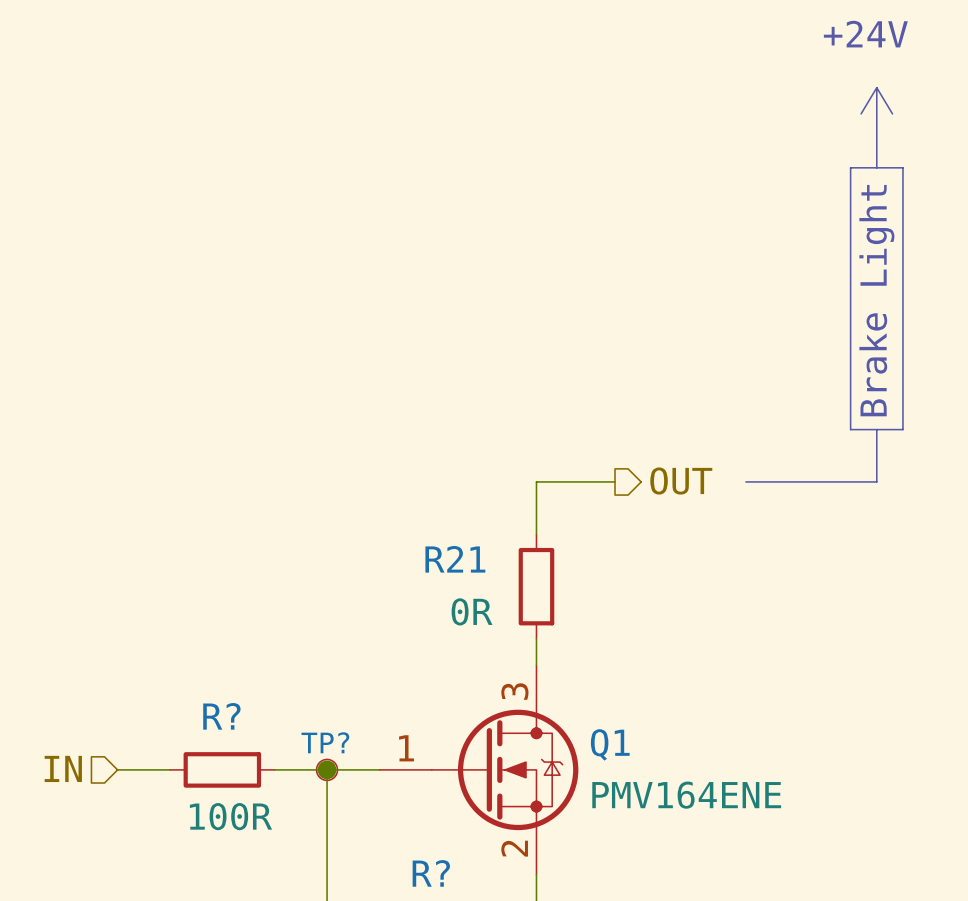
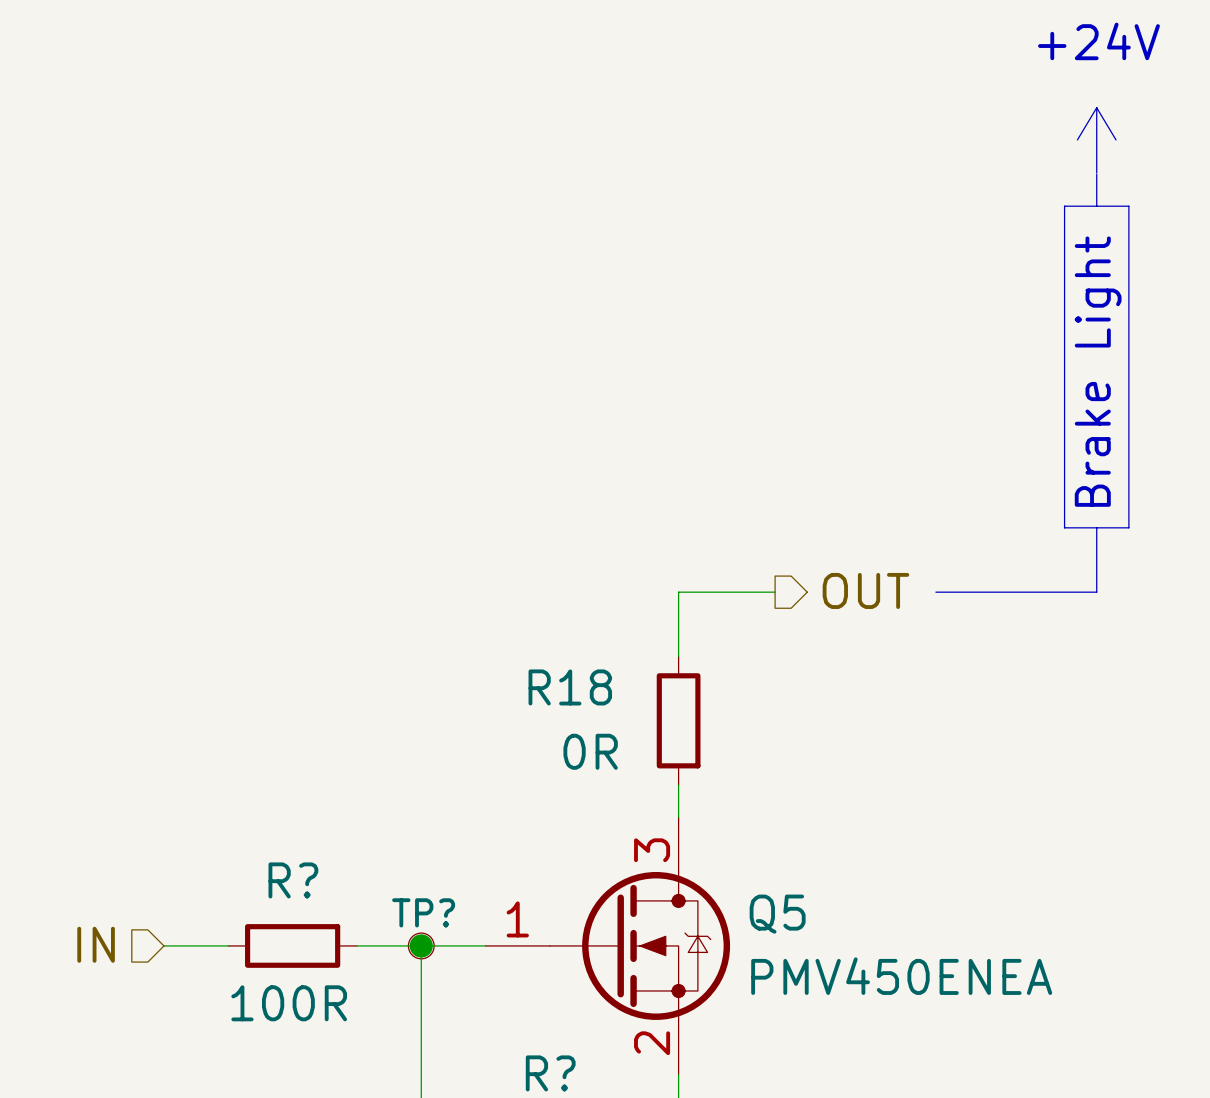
R21 name: R21 (455, 559) -> R18 (570, 687)
Q1 name: Q1 (610, 744) -> Q5 (777, 914)
Q1 value: PMV164ENE (686, 795) -> PMV450ENEA (901, 976)

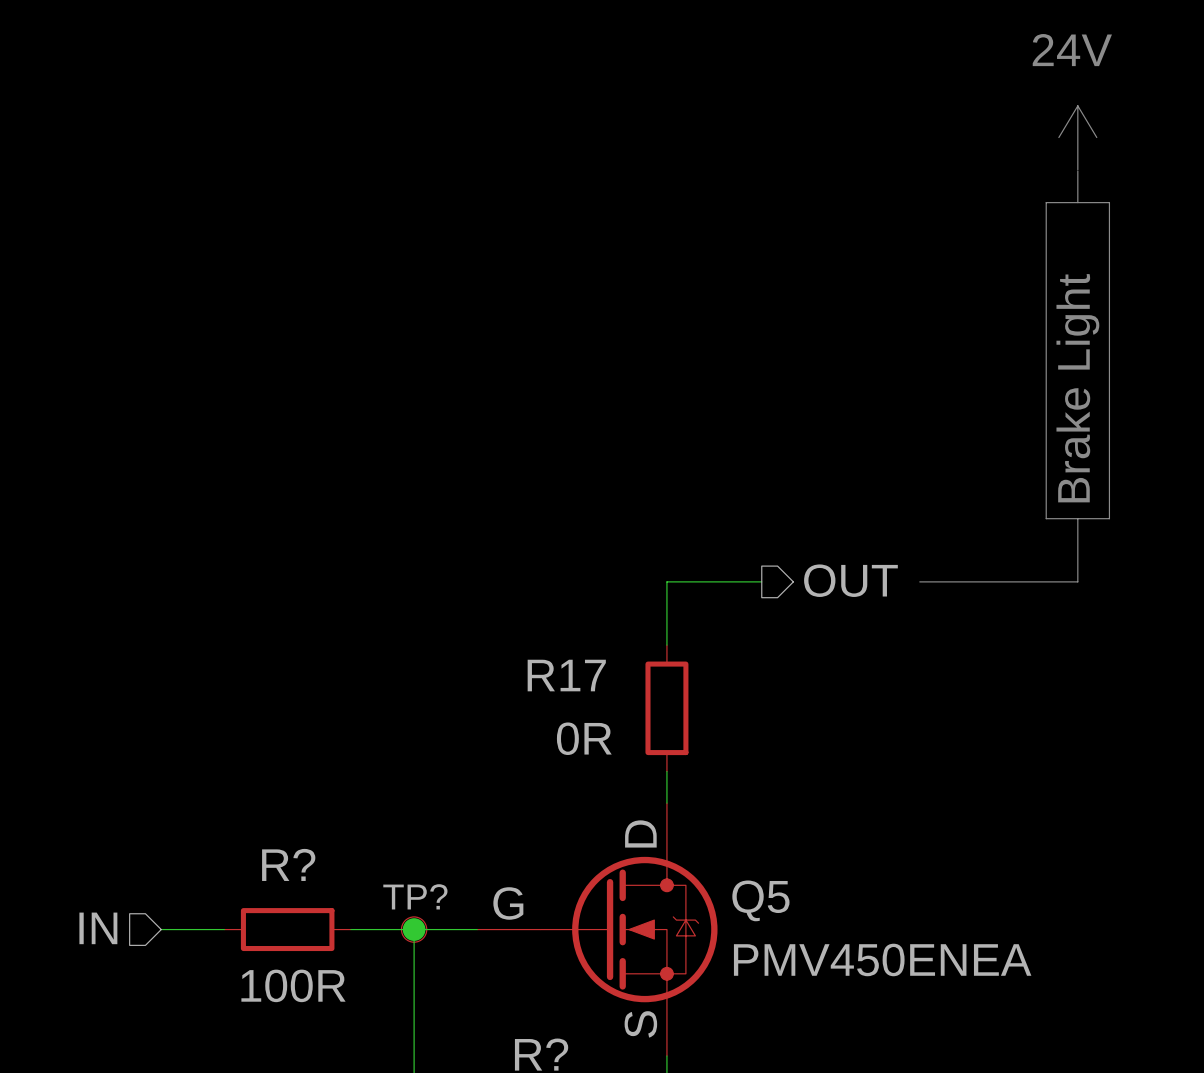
text: +24V (1098, 41) -> 24V (1072, 50)
R18 name: R18 (570, 687) -> R17 (566, 675)
Q5 pin name: none -> D (640, 833)
Q5 pin number: 3 (652, 850) -> none
Q5 pin name: none -> G (508, 903)
Q5 pin number: 1 (517, 919) -> none
Q5 pin name: none -> S (640, 1024)
Q5 pin number: 2 (652, 1043) -> none

